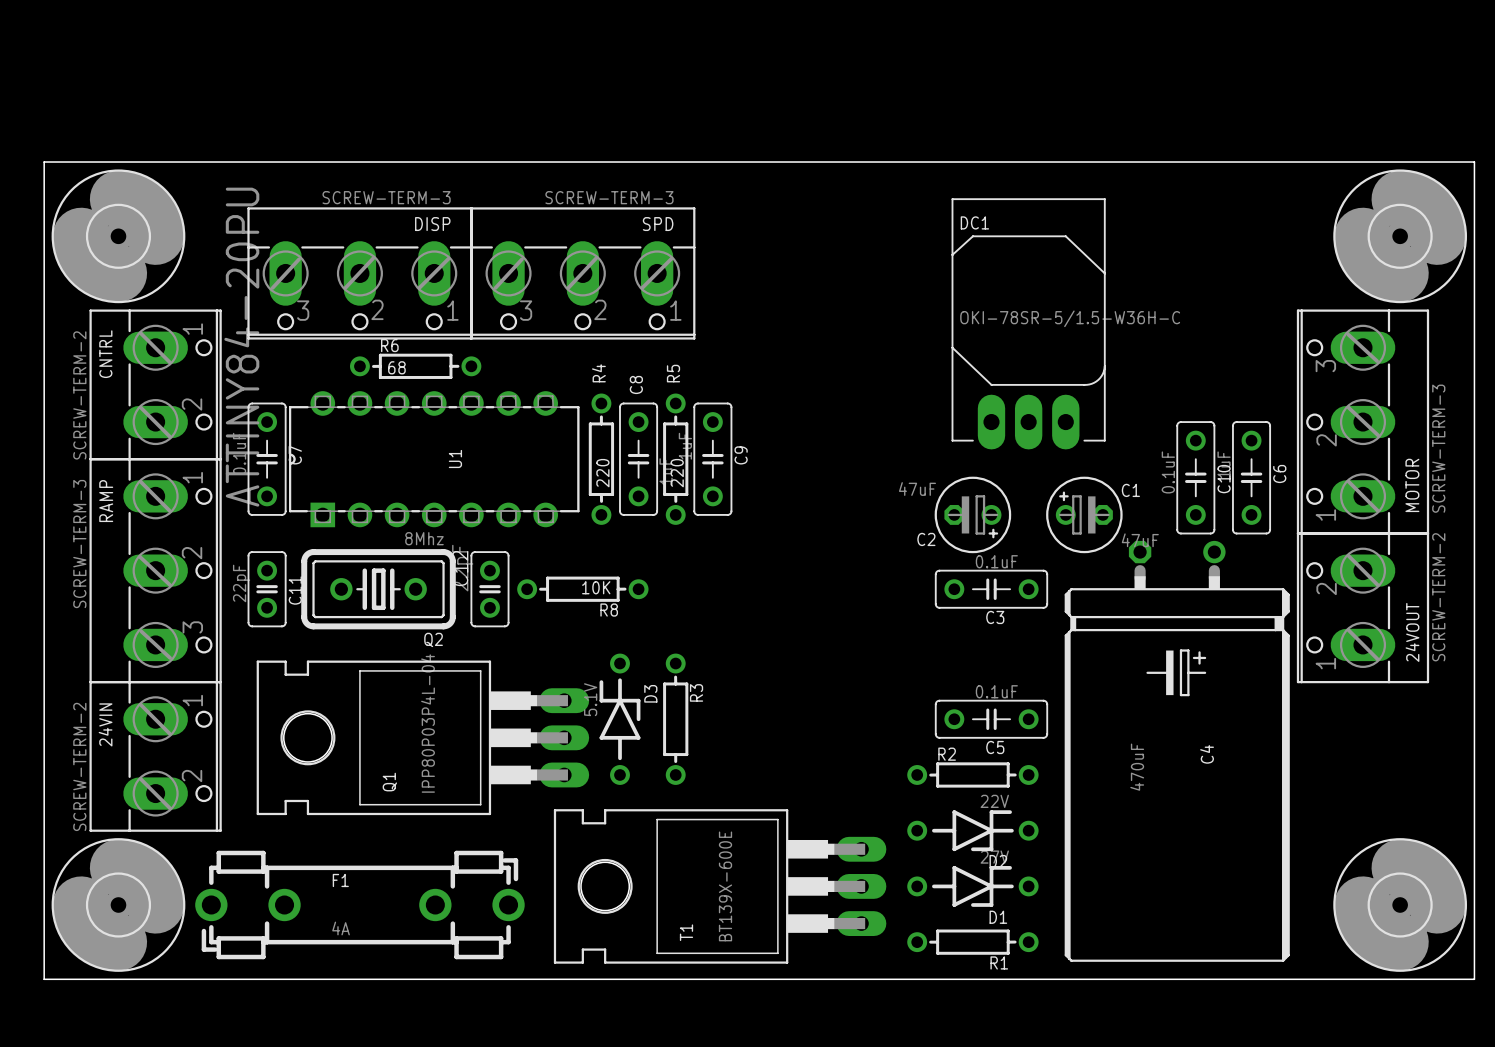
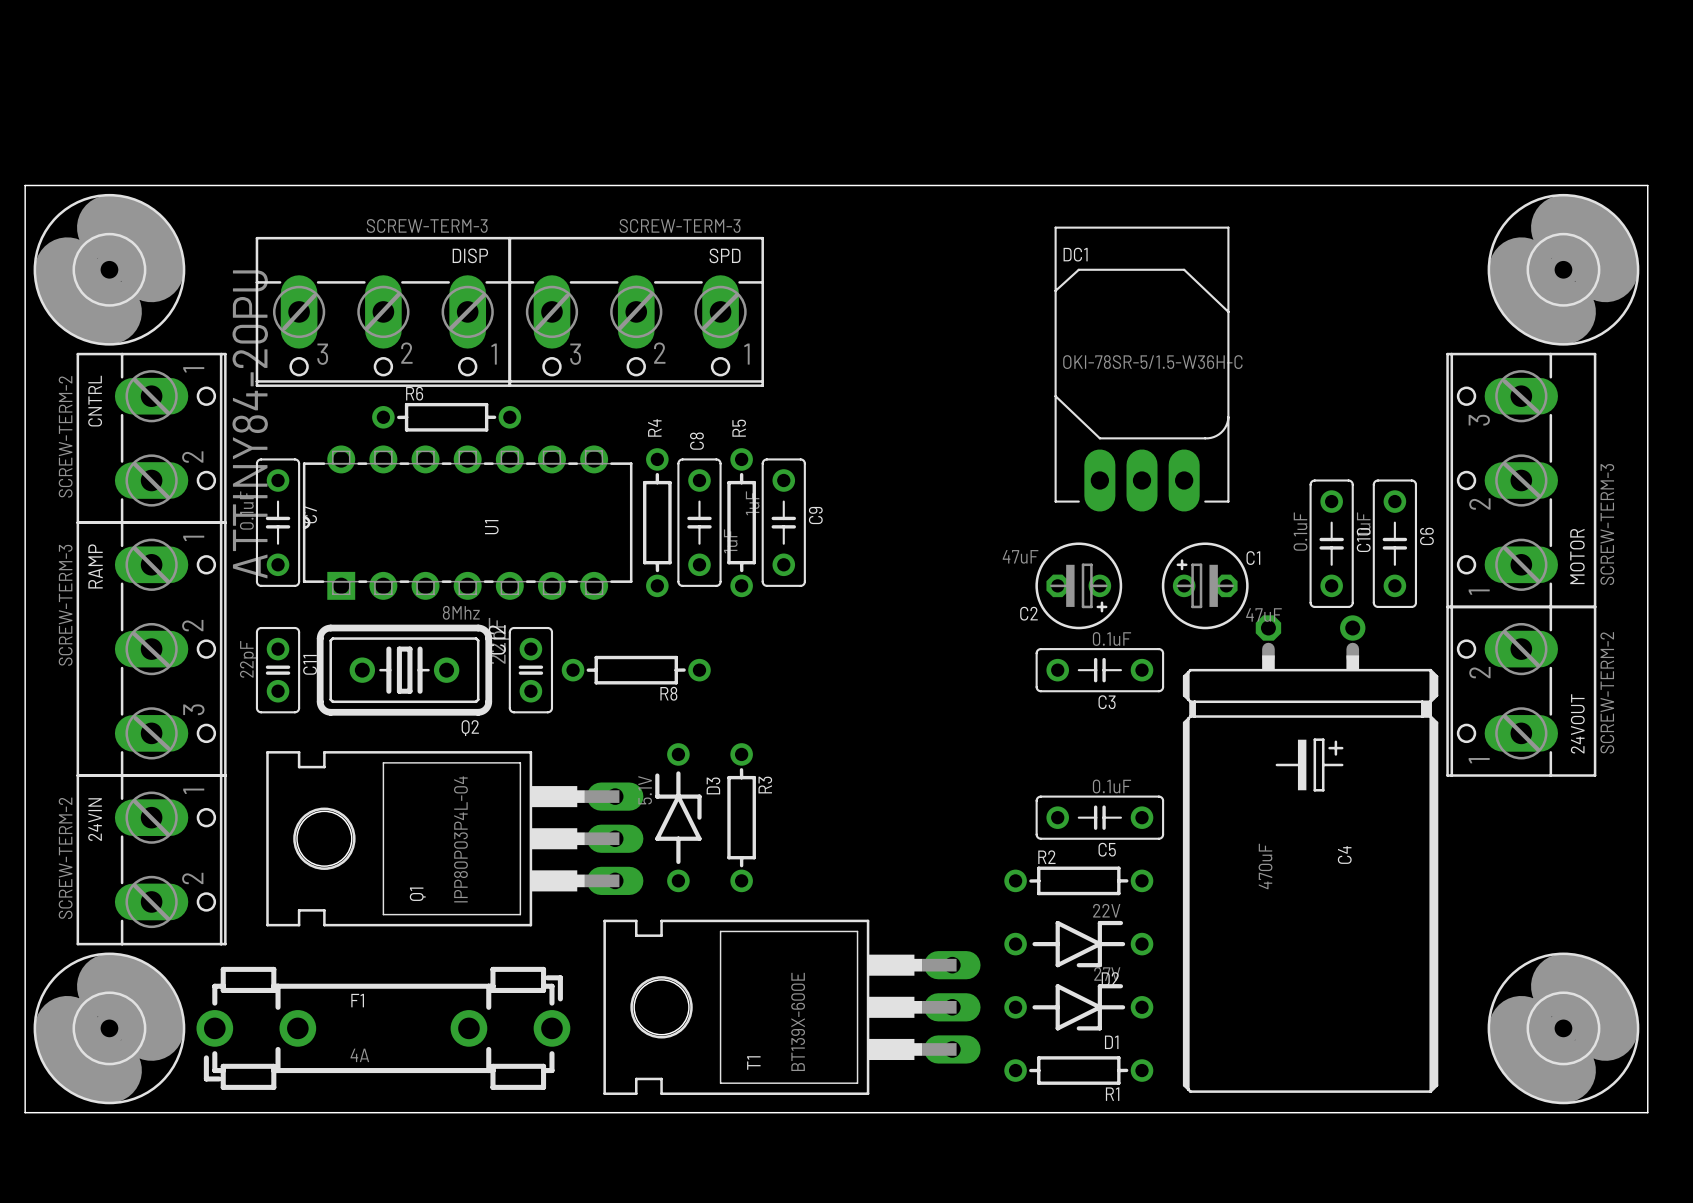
R6 value: 68 (396, 367) -> none
R4 value: 220 (602, 473) -> none
R5 value: 220 (677, 473) -> none
R8 value: 10K (596, 587) -> none

